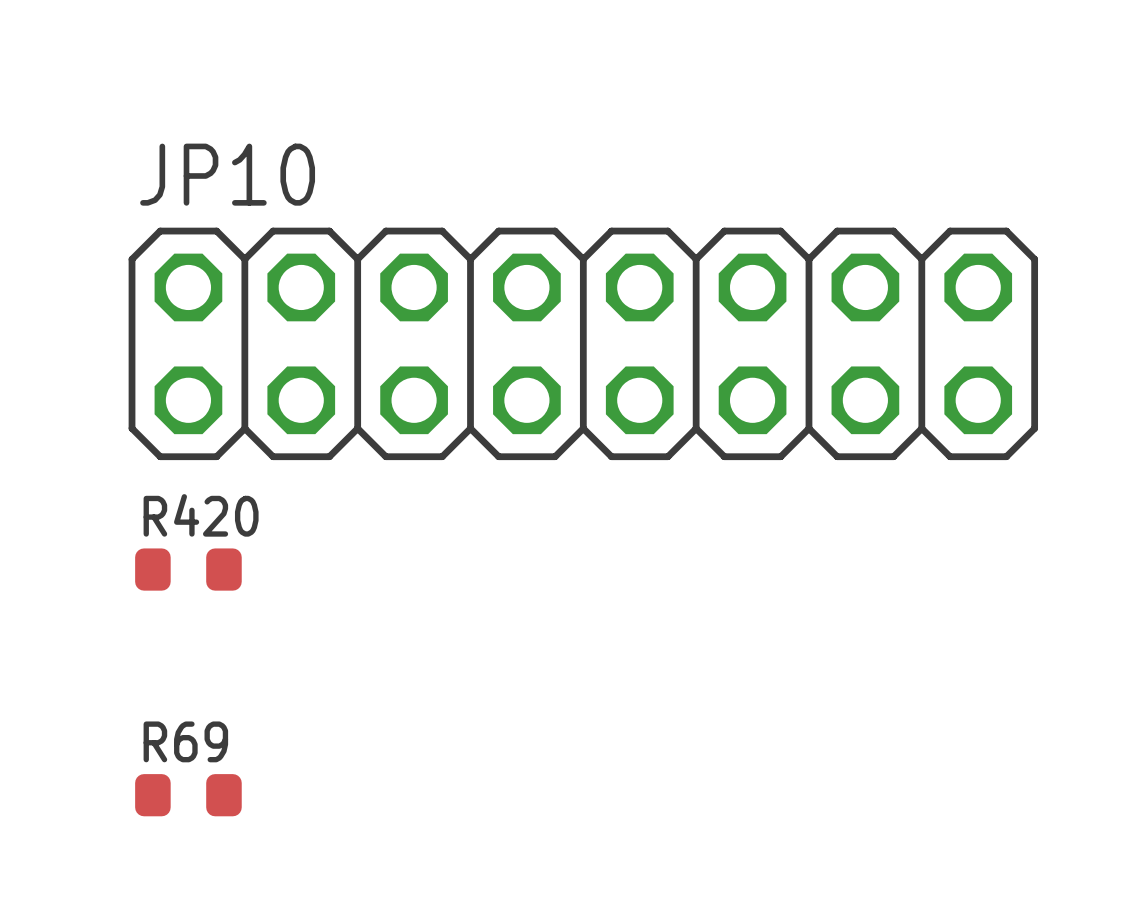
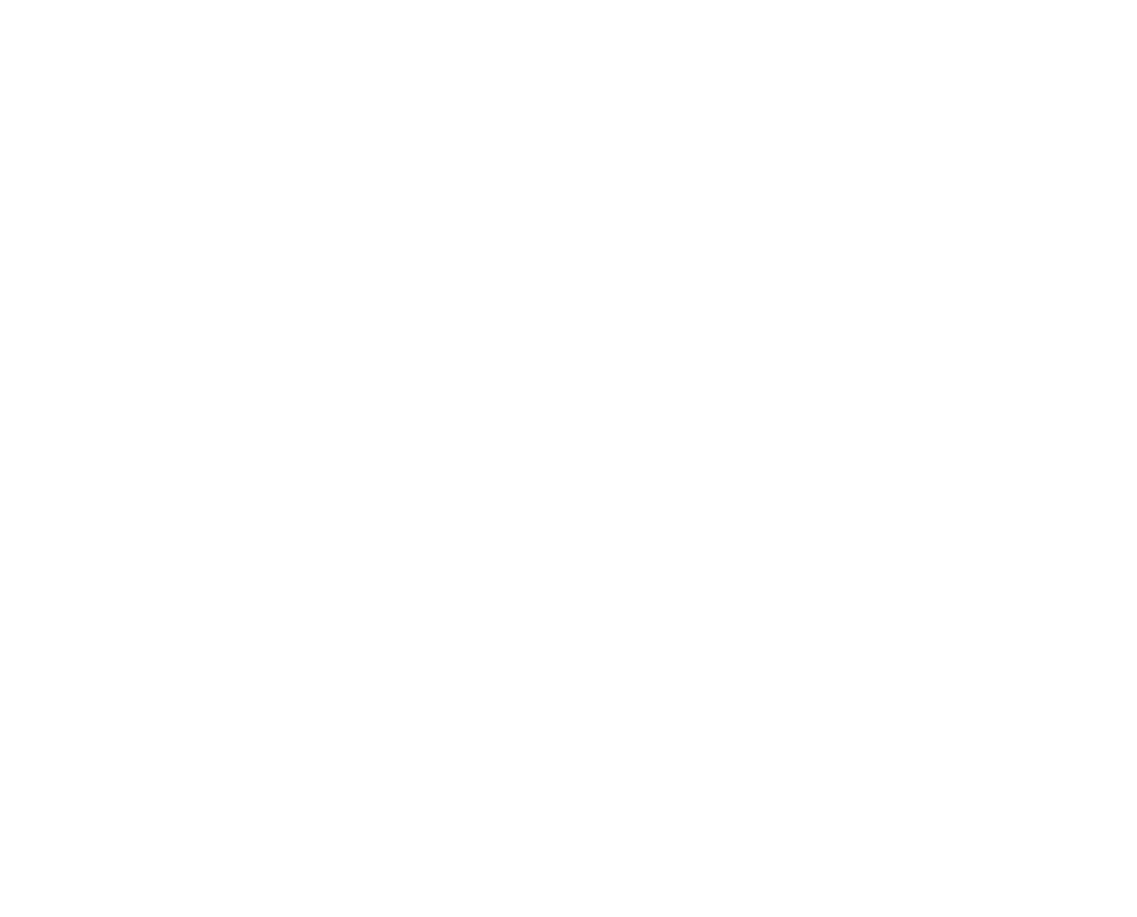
JP10: (583, 343) -> none
R420: (188, 569) -> none
R69: (188, 795) -> none

